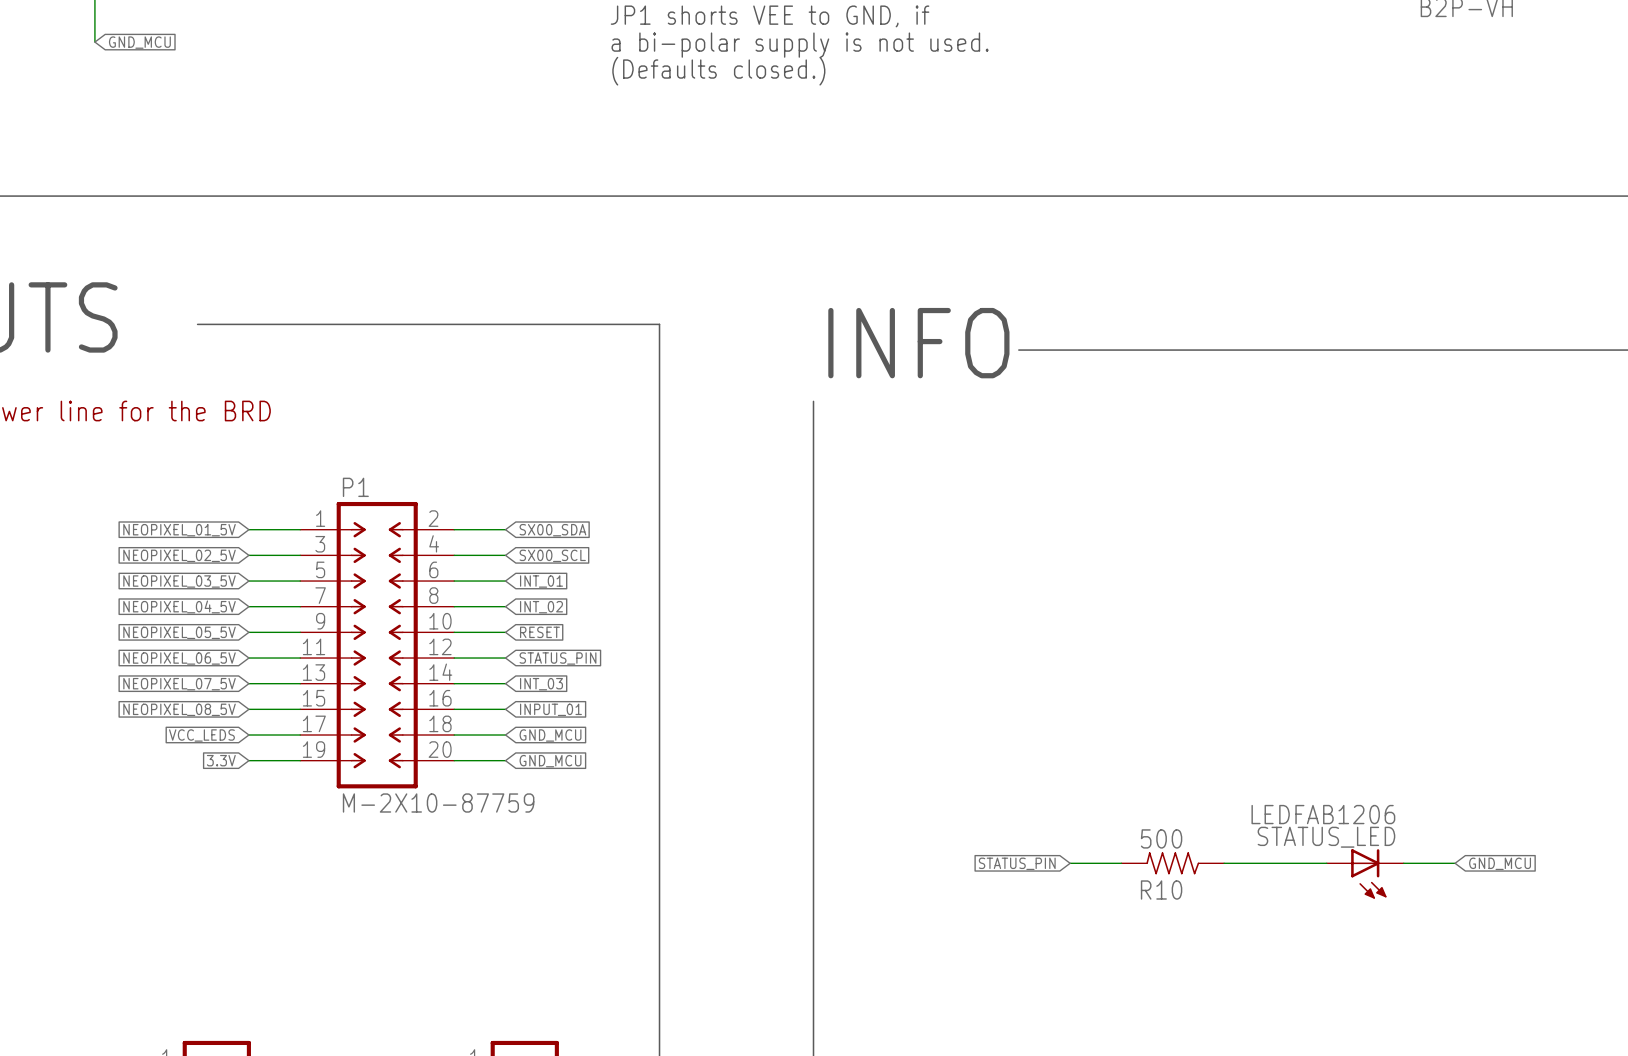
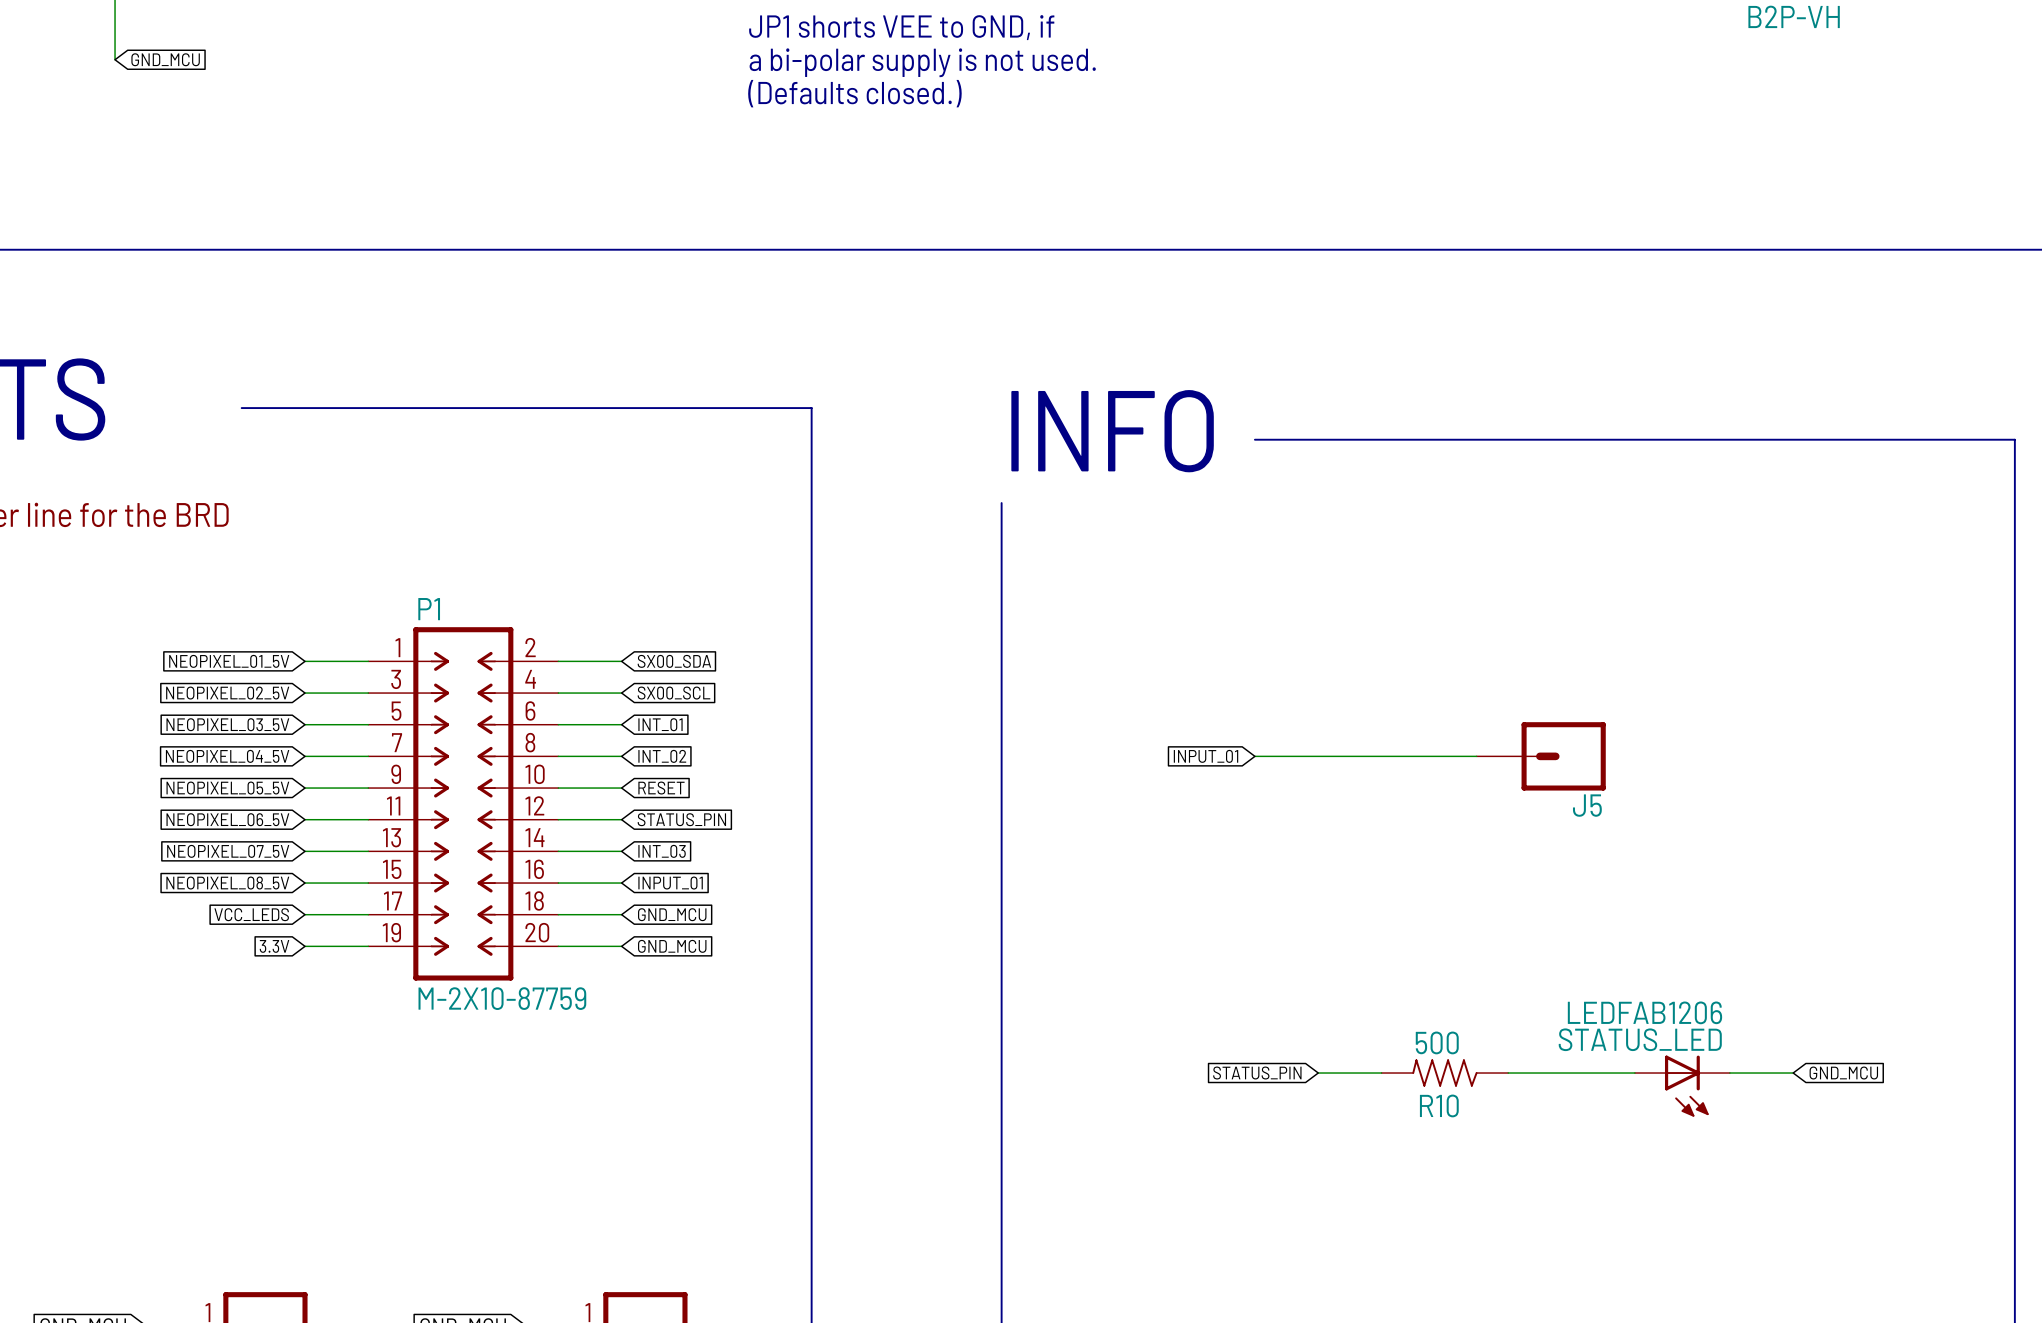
wire: none -> (1254, 756) (1476, 756)
J5: none -> (1541, 756)
global label: none -> INPUT_01 (1206, 756)

